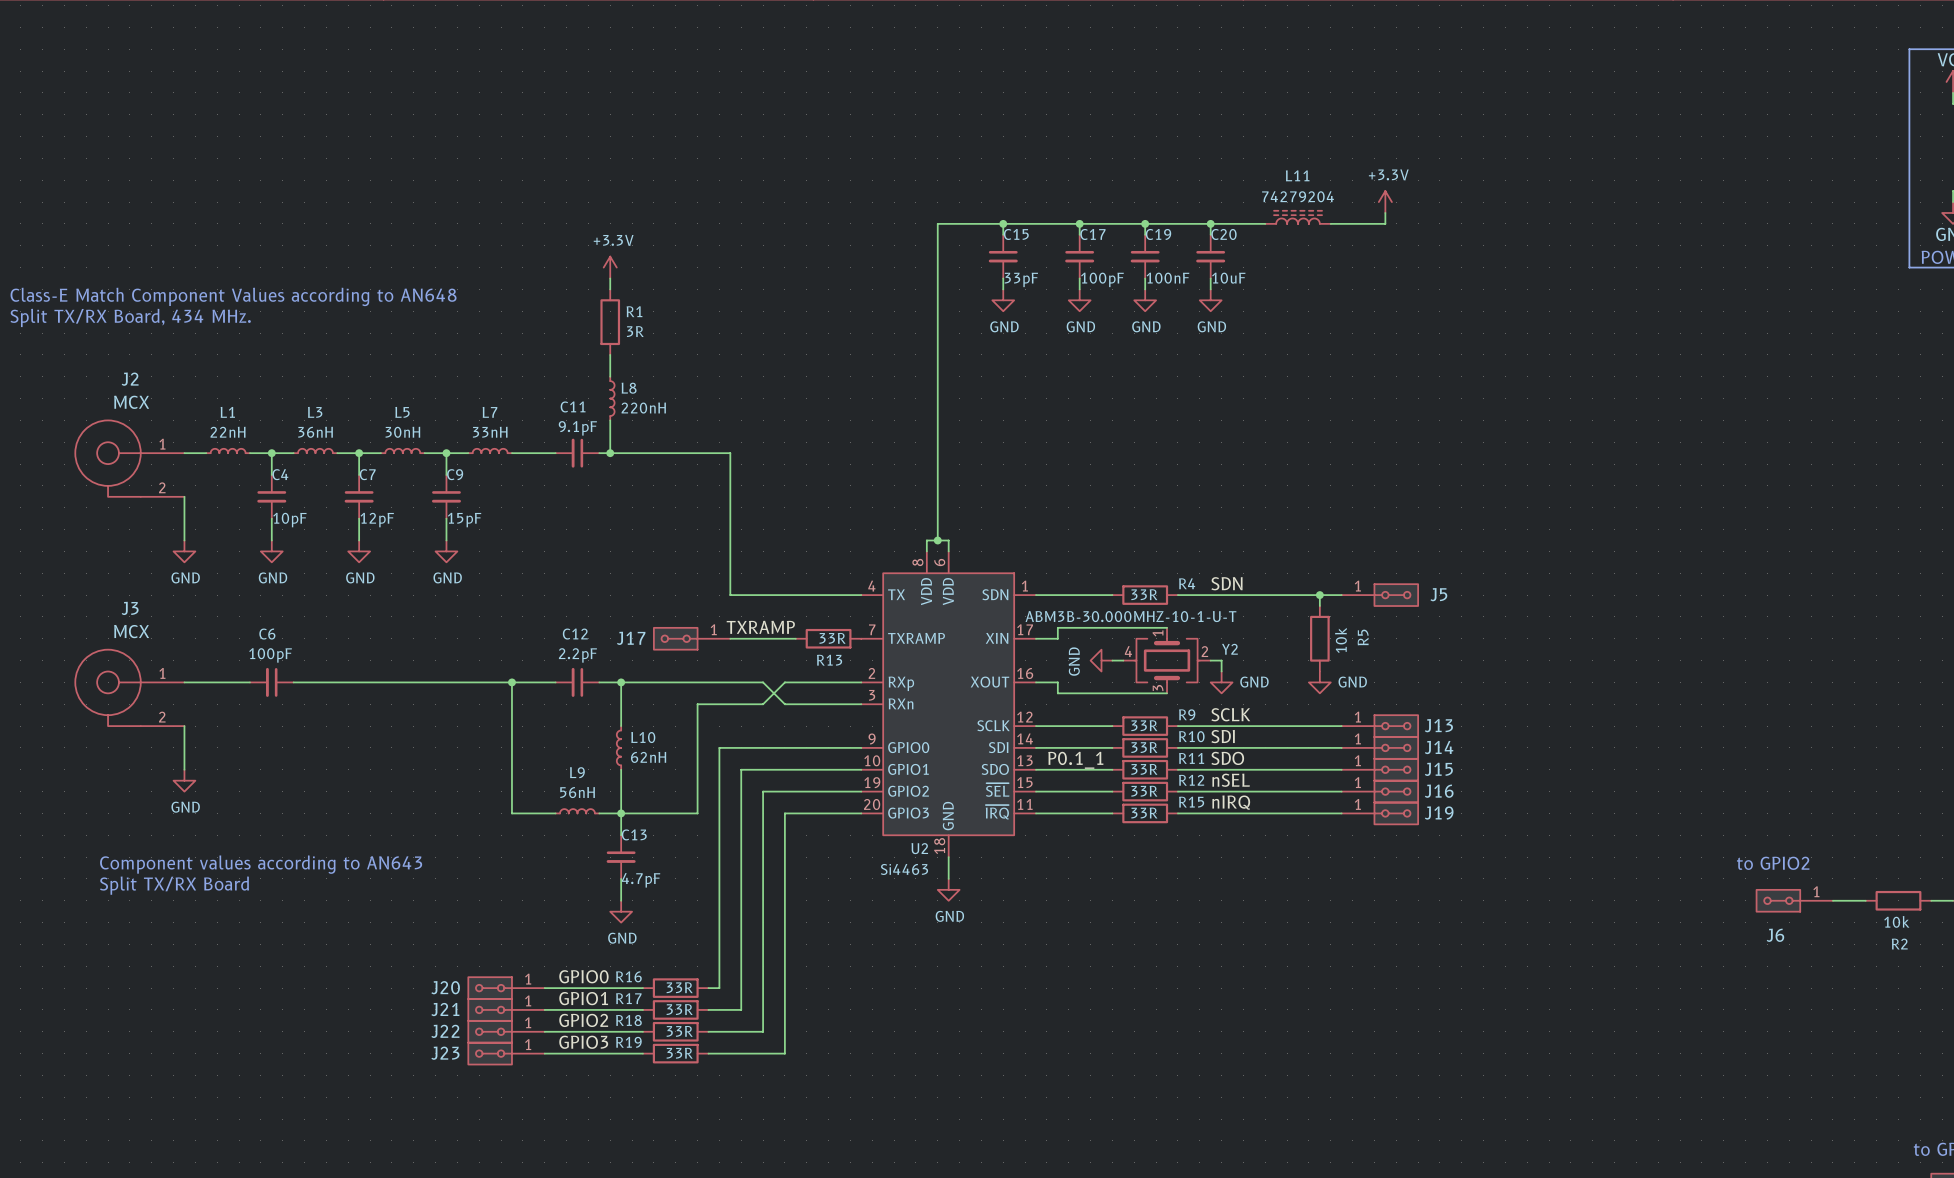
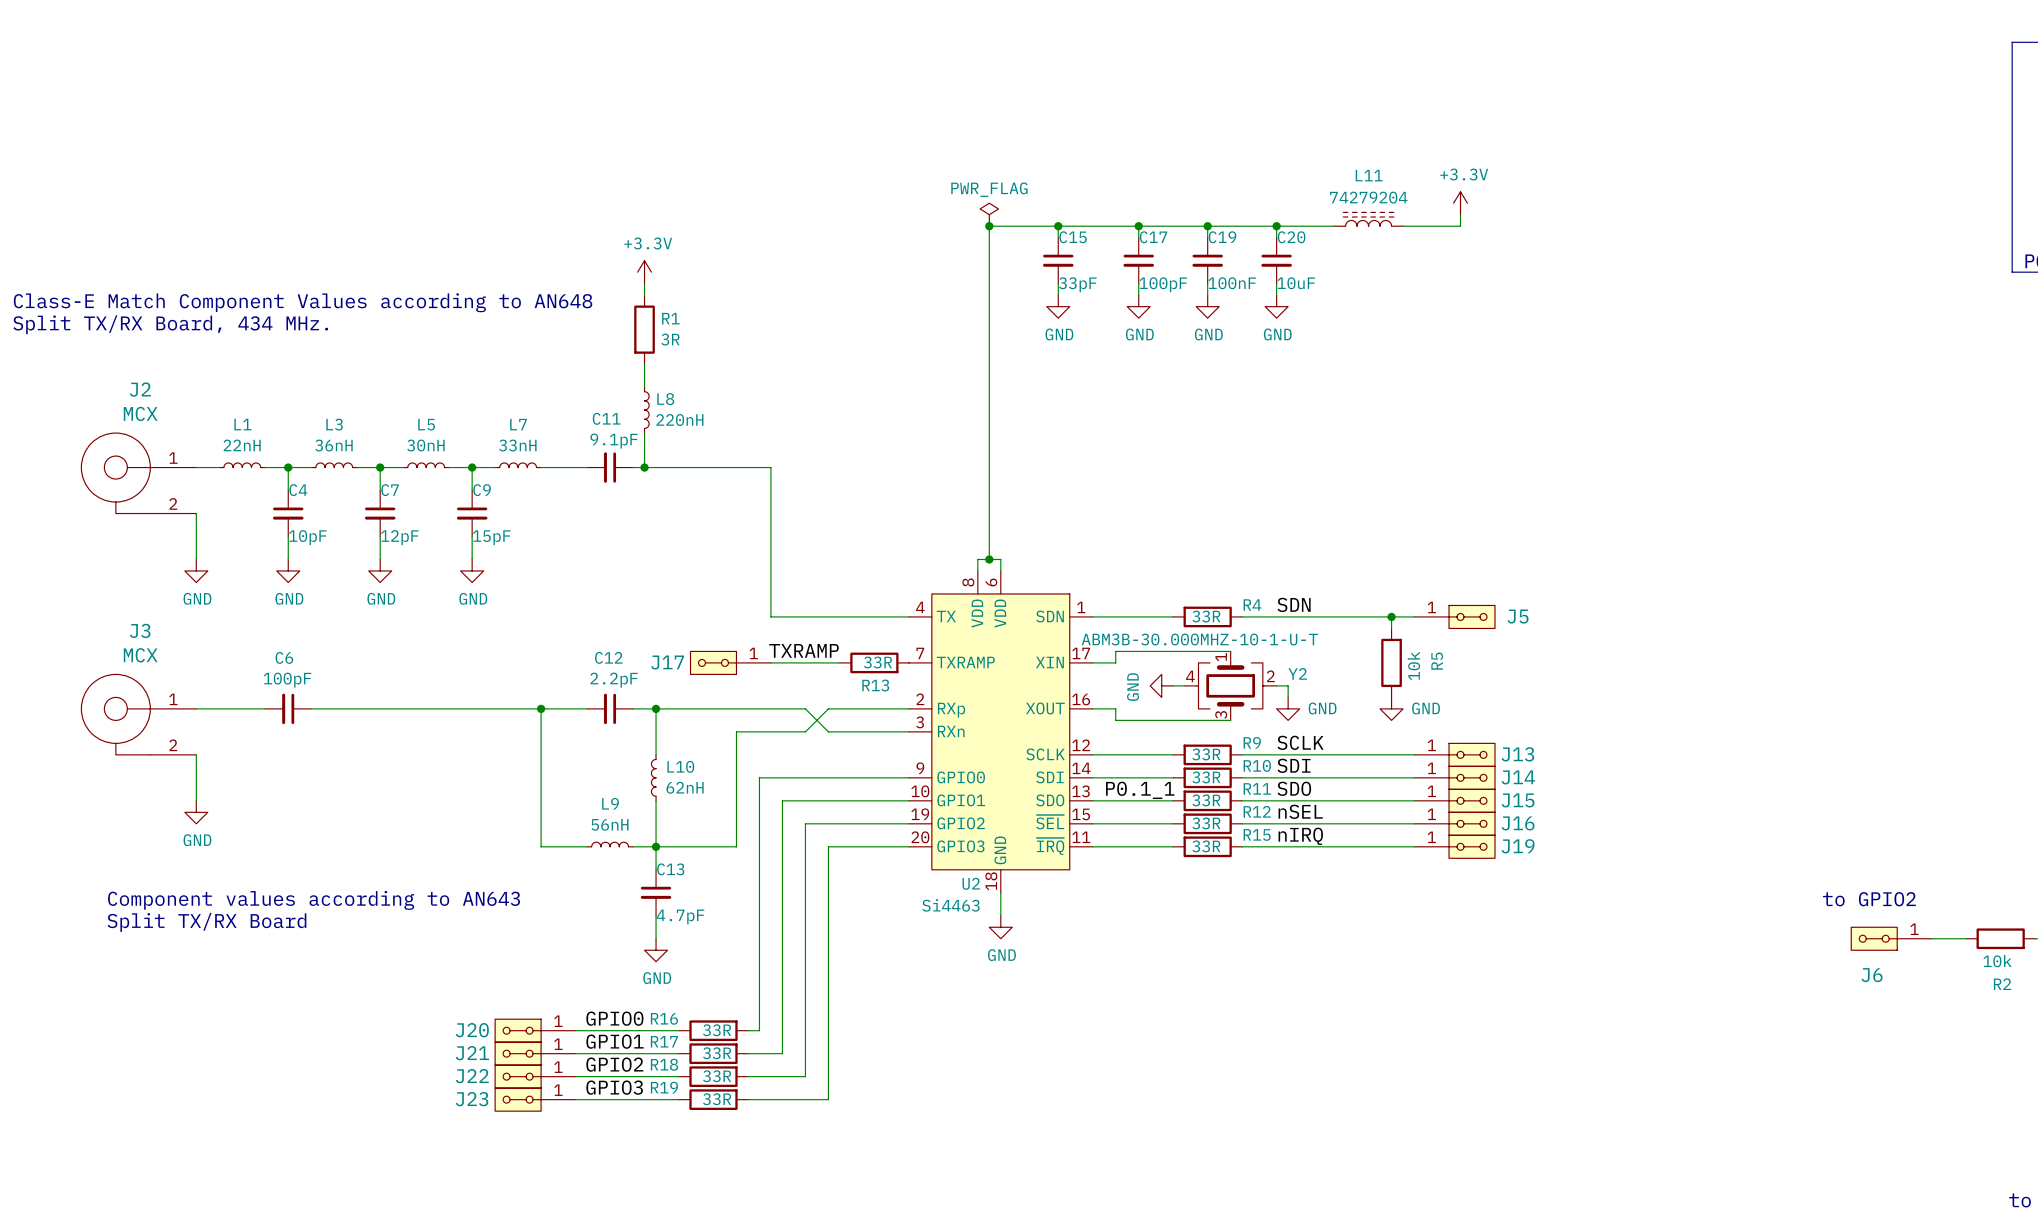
power symbol: none -> PWR_FLAG (989, 214)
junction: none -> (989, 226)

